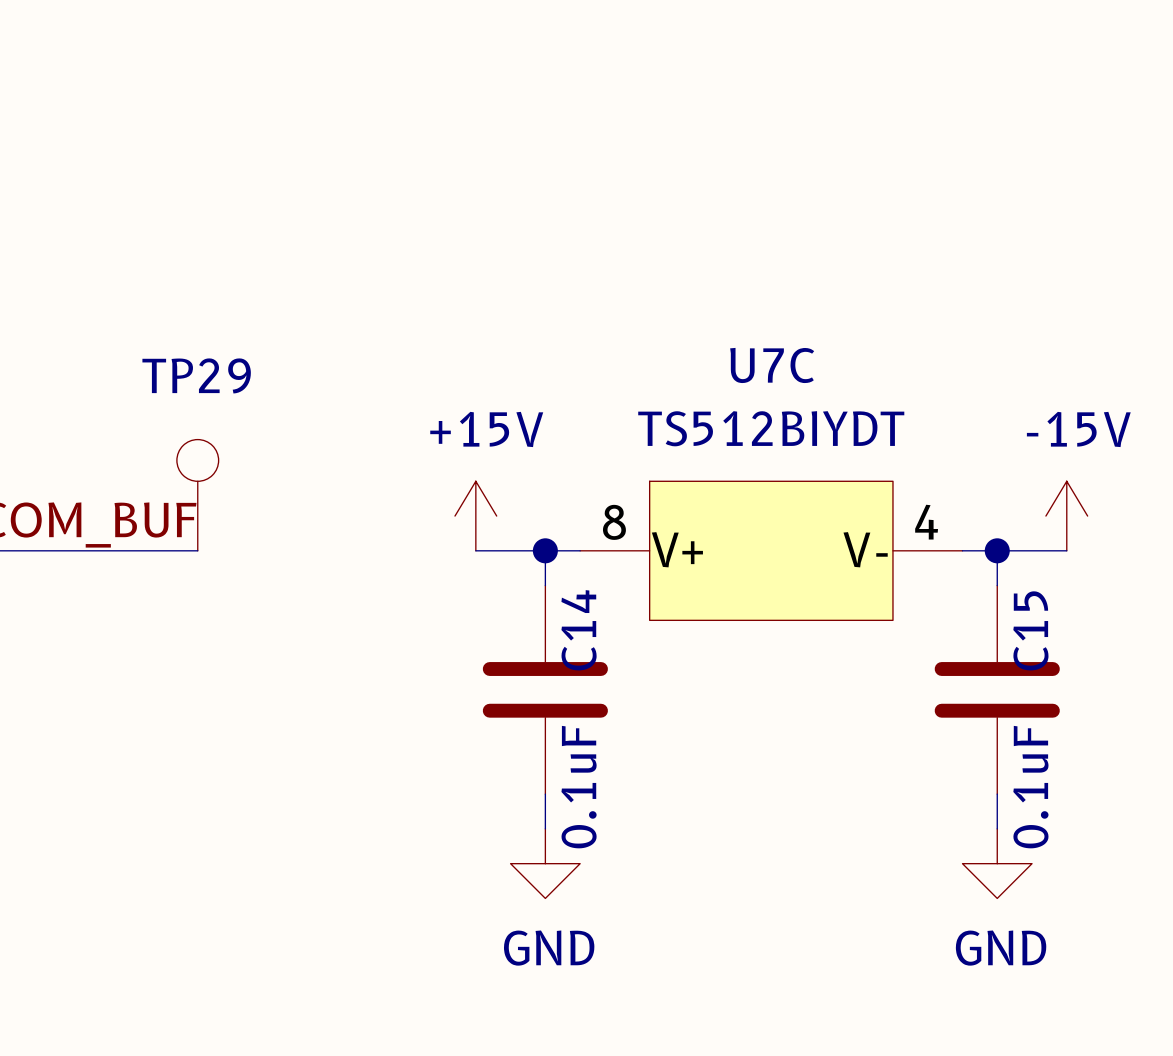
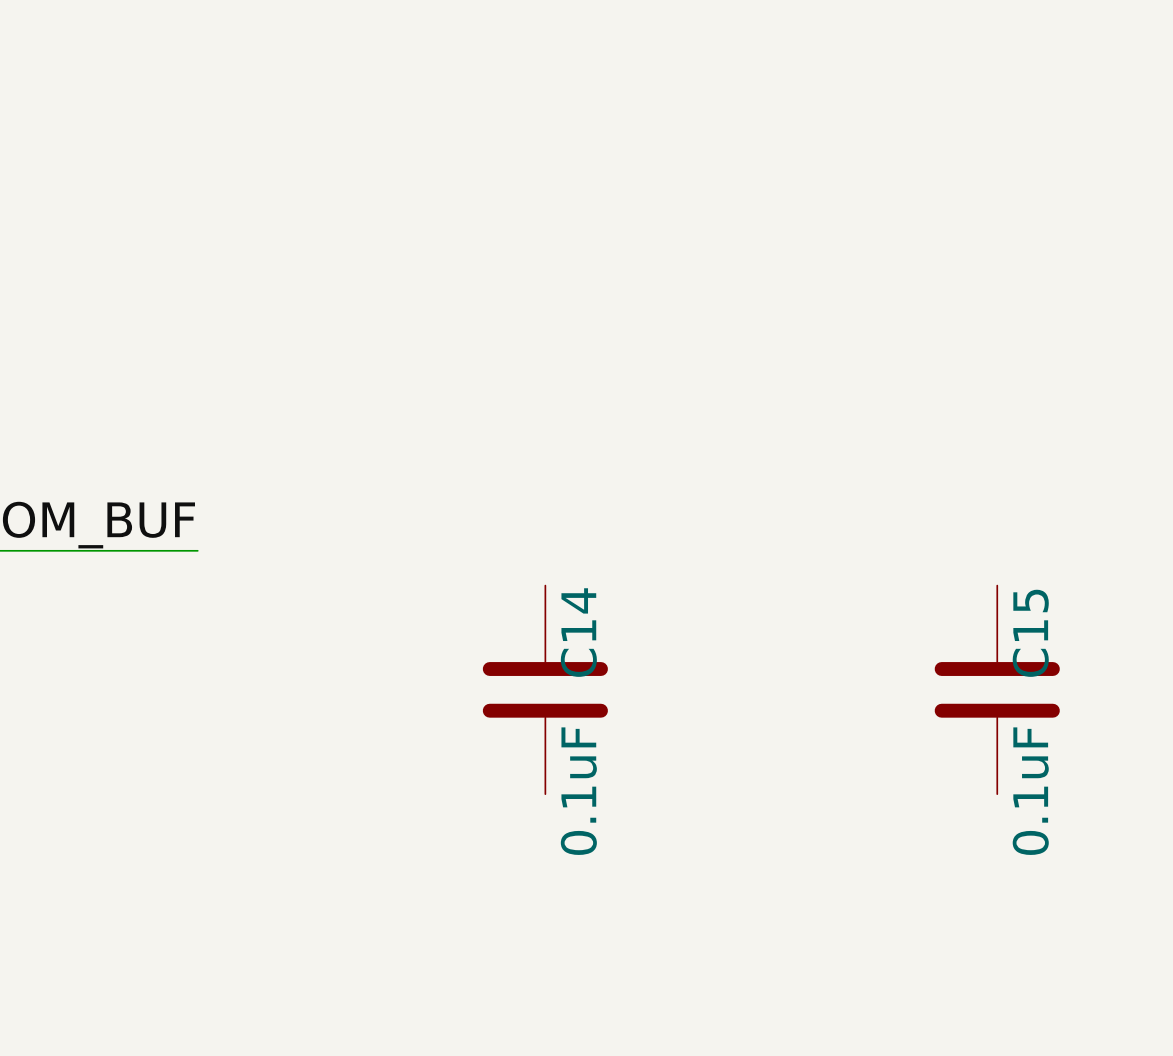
TP29: (197, 495) -> none
power symbol: +15V (475, 516) -> none
power symbol: -15V (1066, 516) -> none
wire: (475, 550) (580, 550) -> none
wire: (545, 550) (545, 585) -> none
junction: (545, 550) -> none
U7C: TS512BIYDT (771, 550) -> none
wire: (962, 550) (1066, 550) -> none
wire: (997, 550) (997, 585) -> none
junction: (997, 550) -> none
wire: (545, 794) (545, 828) -> none
wire: (997, 794) (997, 828) -> none
power symbol: GND (545, 863) -> none
power symbol: GND (997, 863) -> none

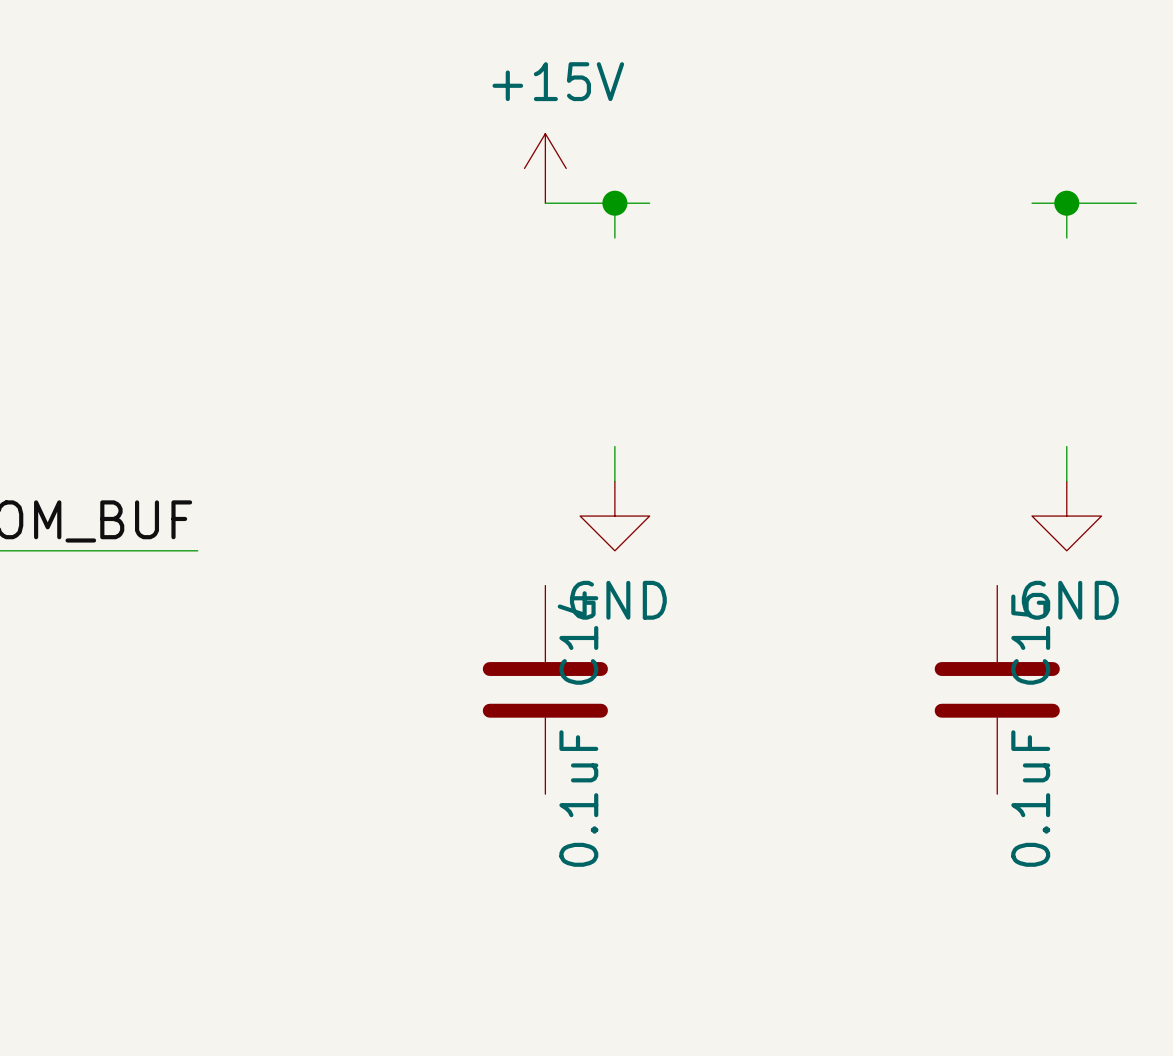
power symbol: none -> +15V (545, 168)
wire: none -> (545, 203) (649, 203)
wire: none -> (614, 203) (614, 237)
junction: none -> (614, 203)
wire: none -> (1032, 203) (1136, 203)
wire: none -> (1066, 203) (1066, 237)
junction: none -> (1066, 203)
wire: none -> (614, 446) (614, 481)
wire: none -> (1066, 446) (1066, 481)
power symbol: none -> GND (614, 516)
power symbol: none -> GND (1066, 516)

